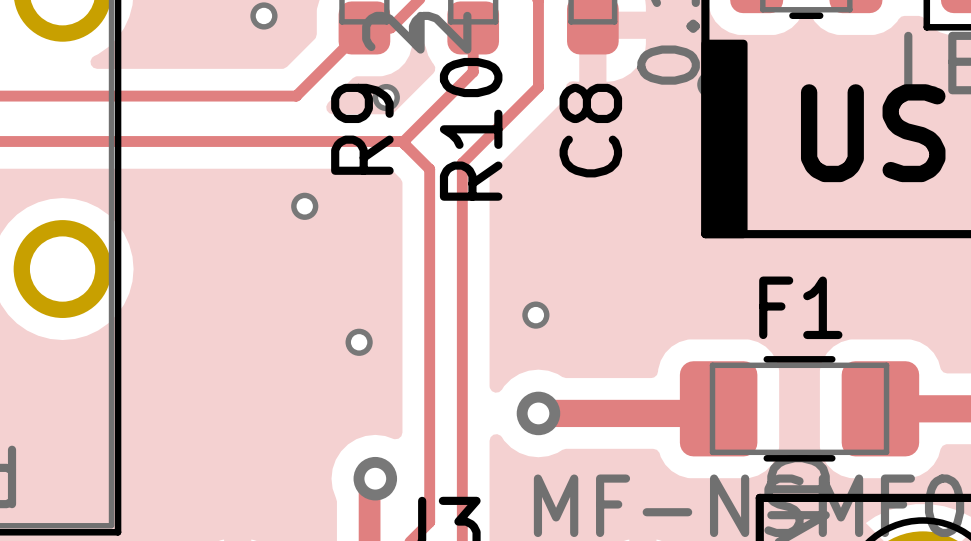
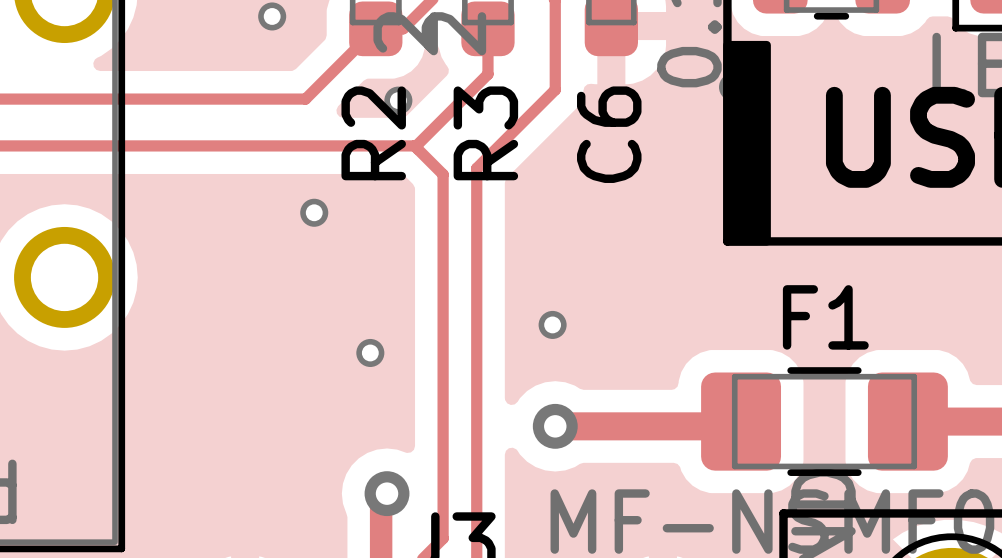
R9 name: R9 (362, 129) -> R2 (373, 133)
R10 name: R10 (471, 129) -> R3 (485, 133)
C8 name: C8 (590, 130) -> C6 (609, 134)

